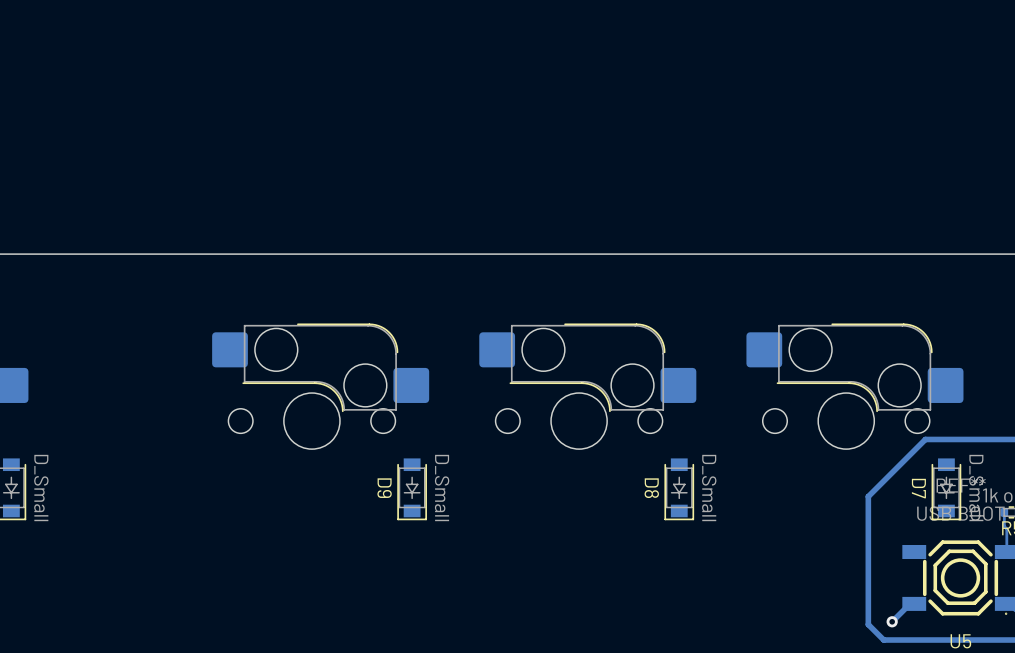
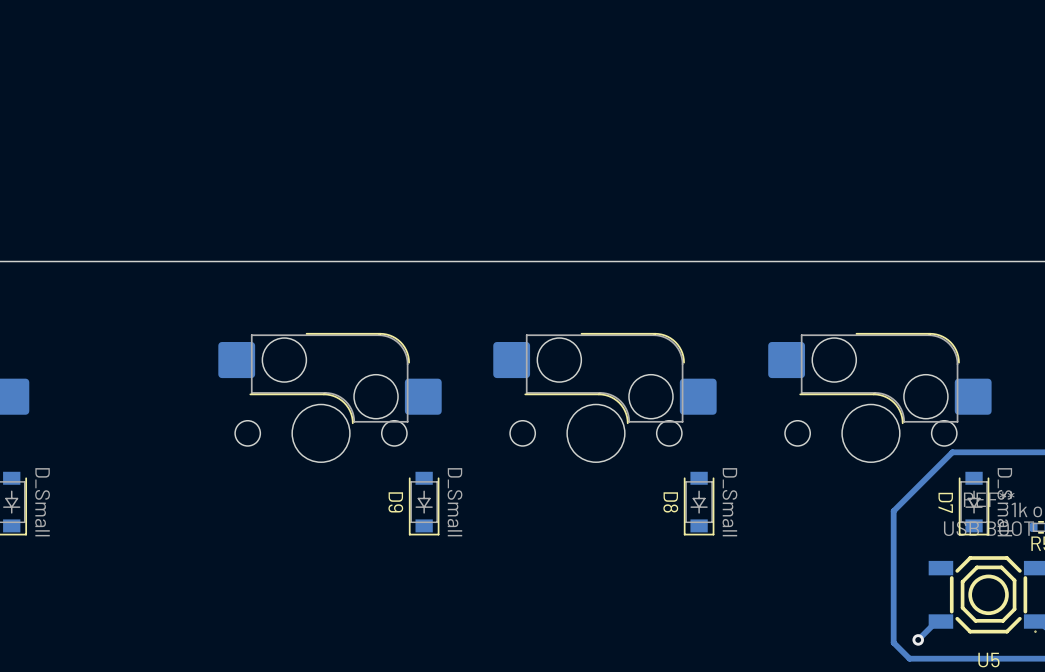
bottom track: (1004, 512) (1006, 552) -> none

